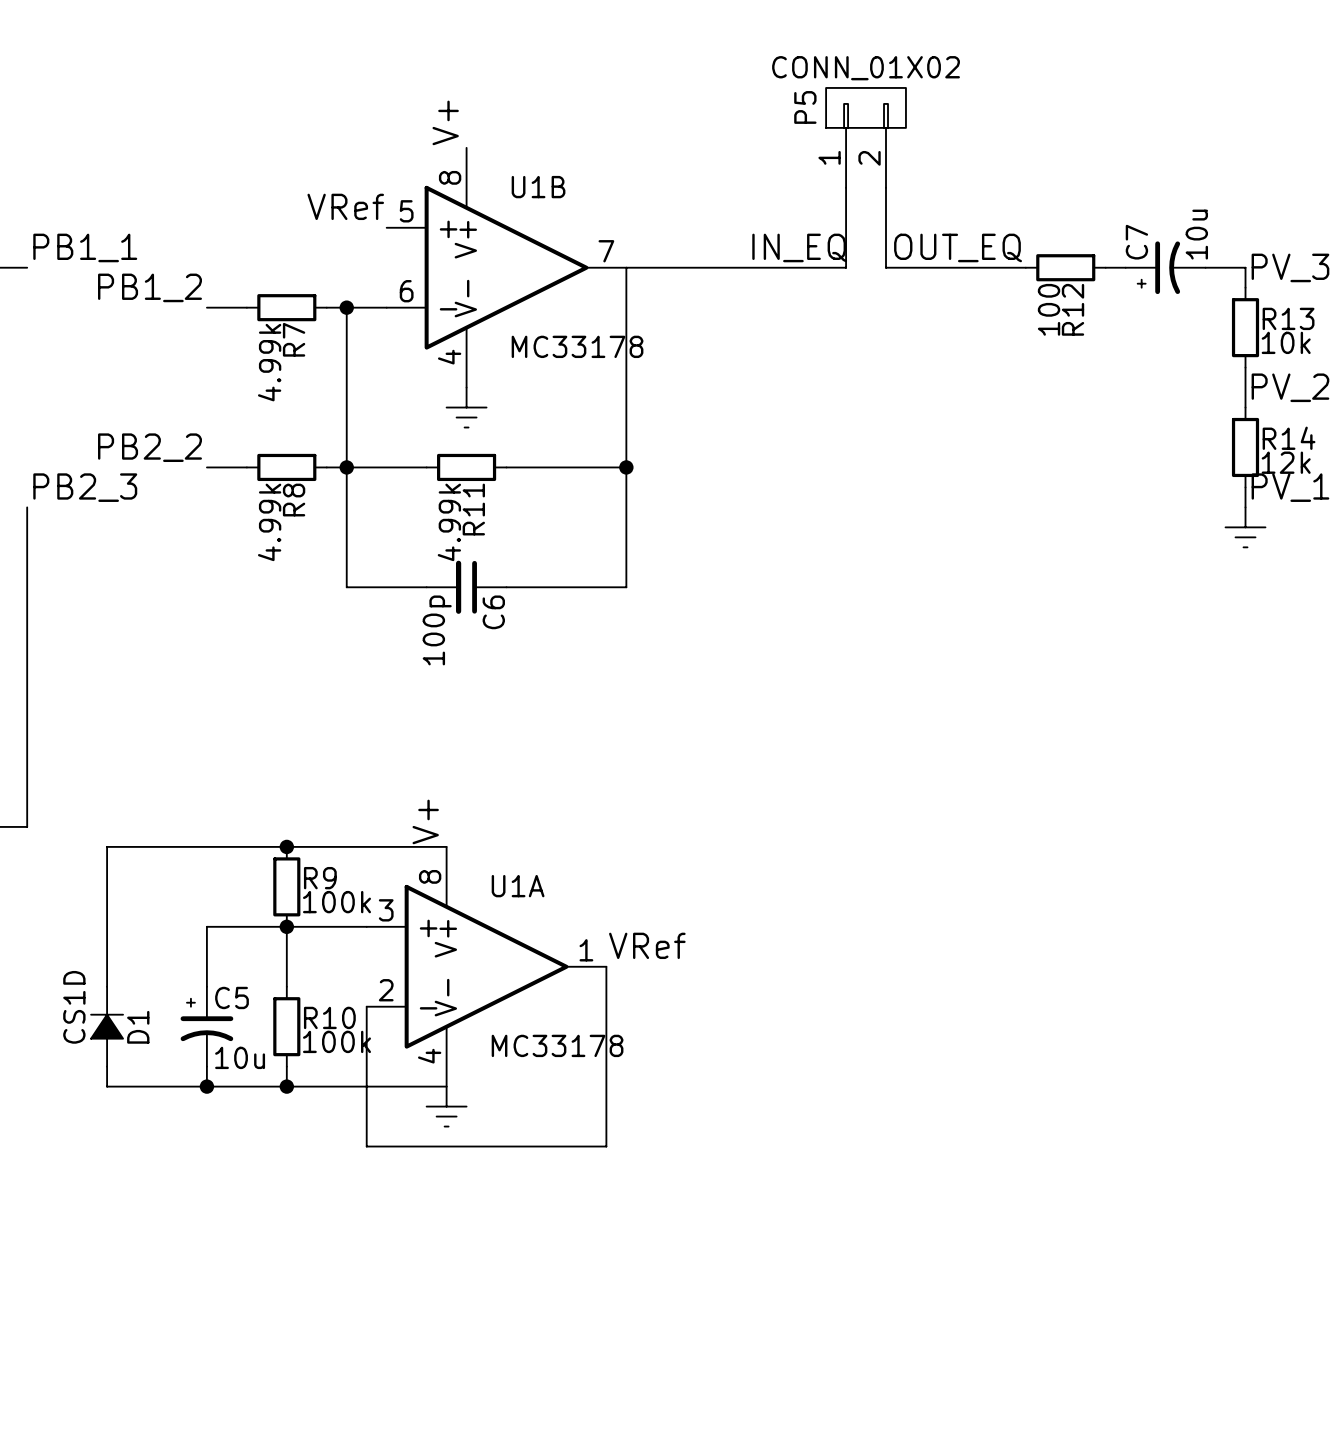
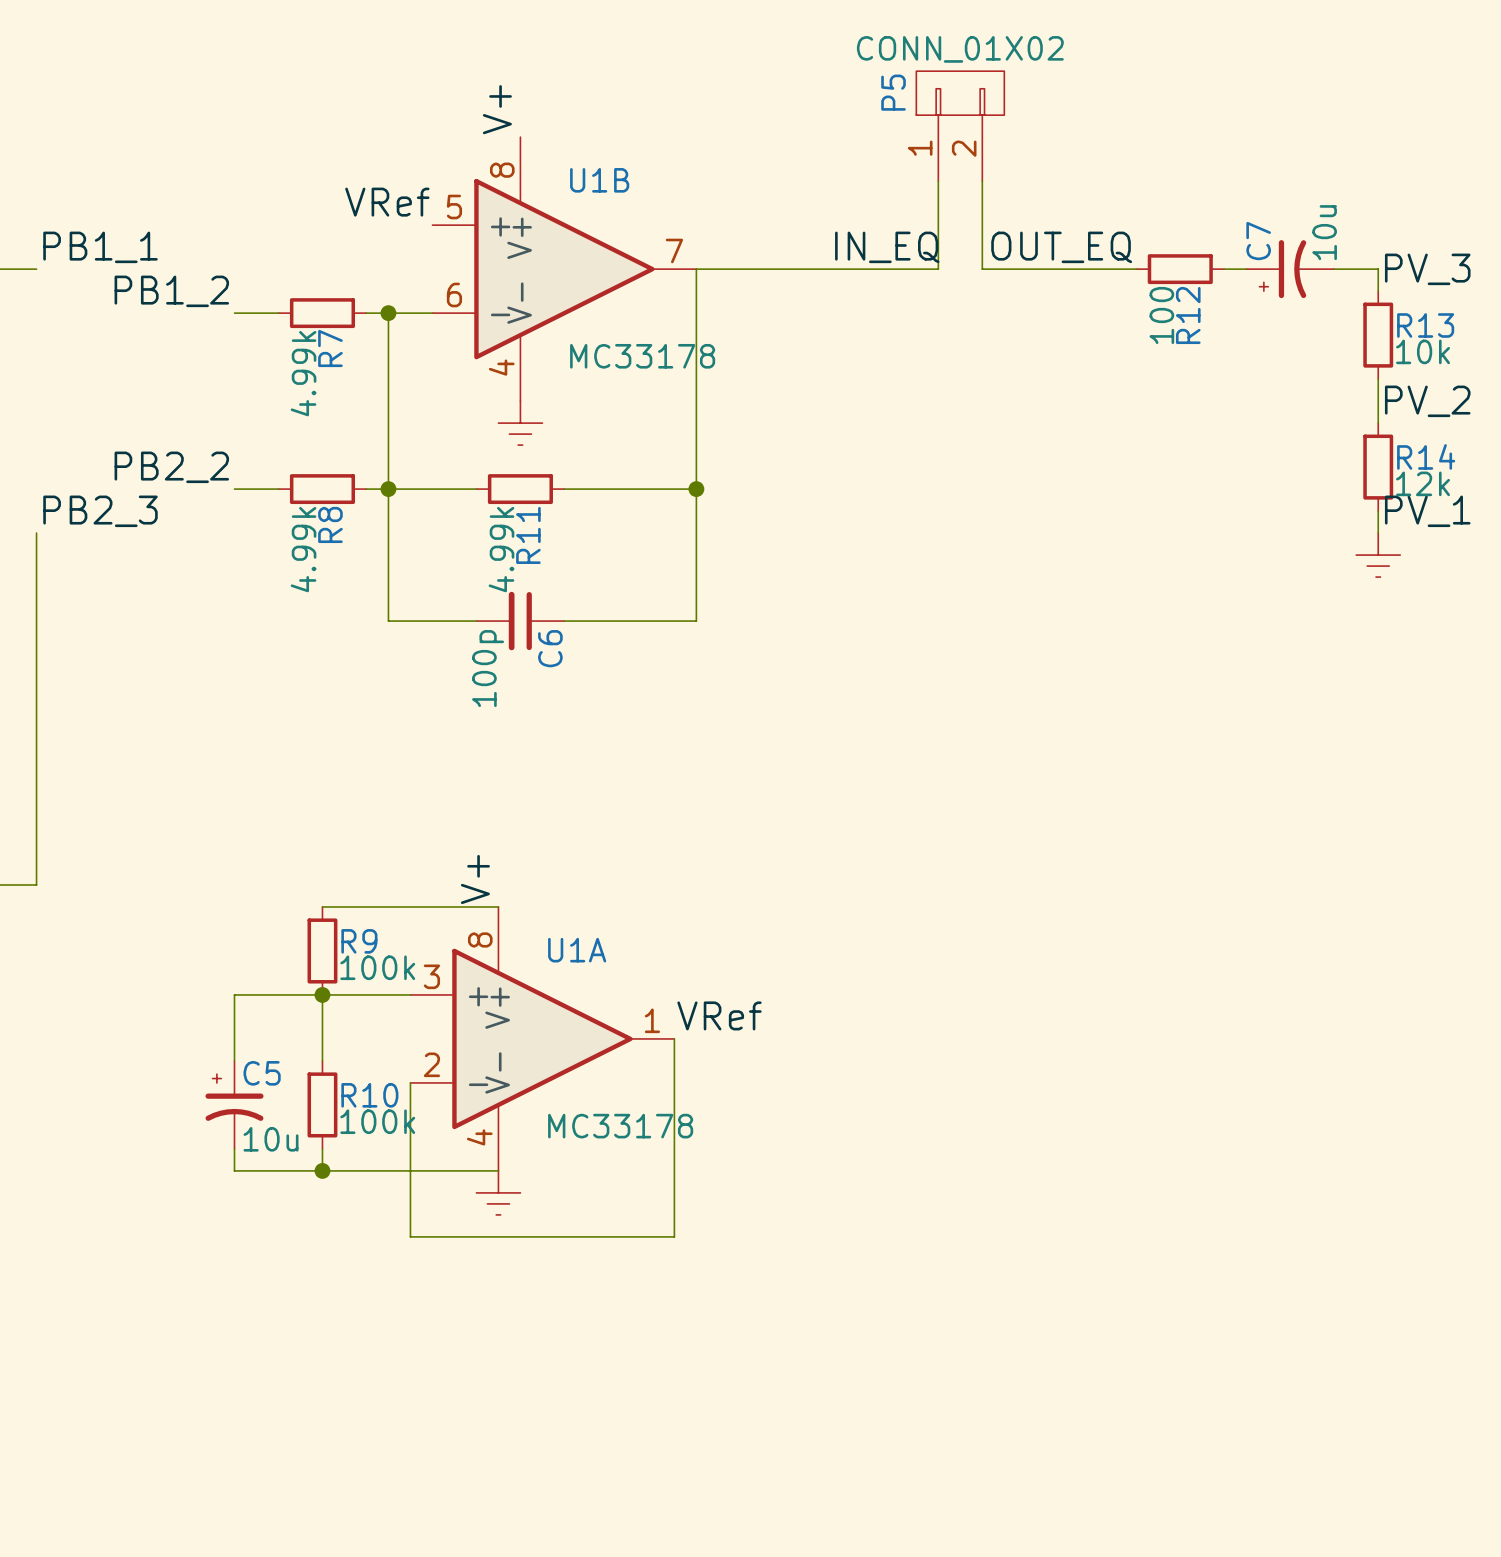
wire: (286, 846) (107, 846) (107, 986) -> none
junction: (286, 846) -> none
D1: CS1D (107, 1026) -> none
wire: (107, 1066) (107, 1086) (206, 1086) -> none
junction: (206, 1086) -> none

